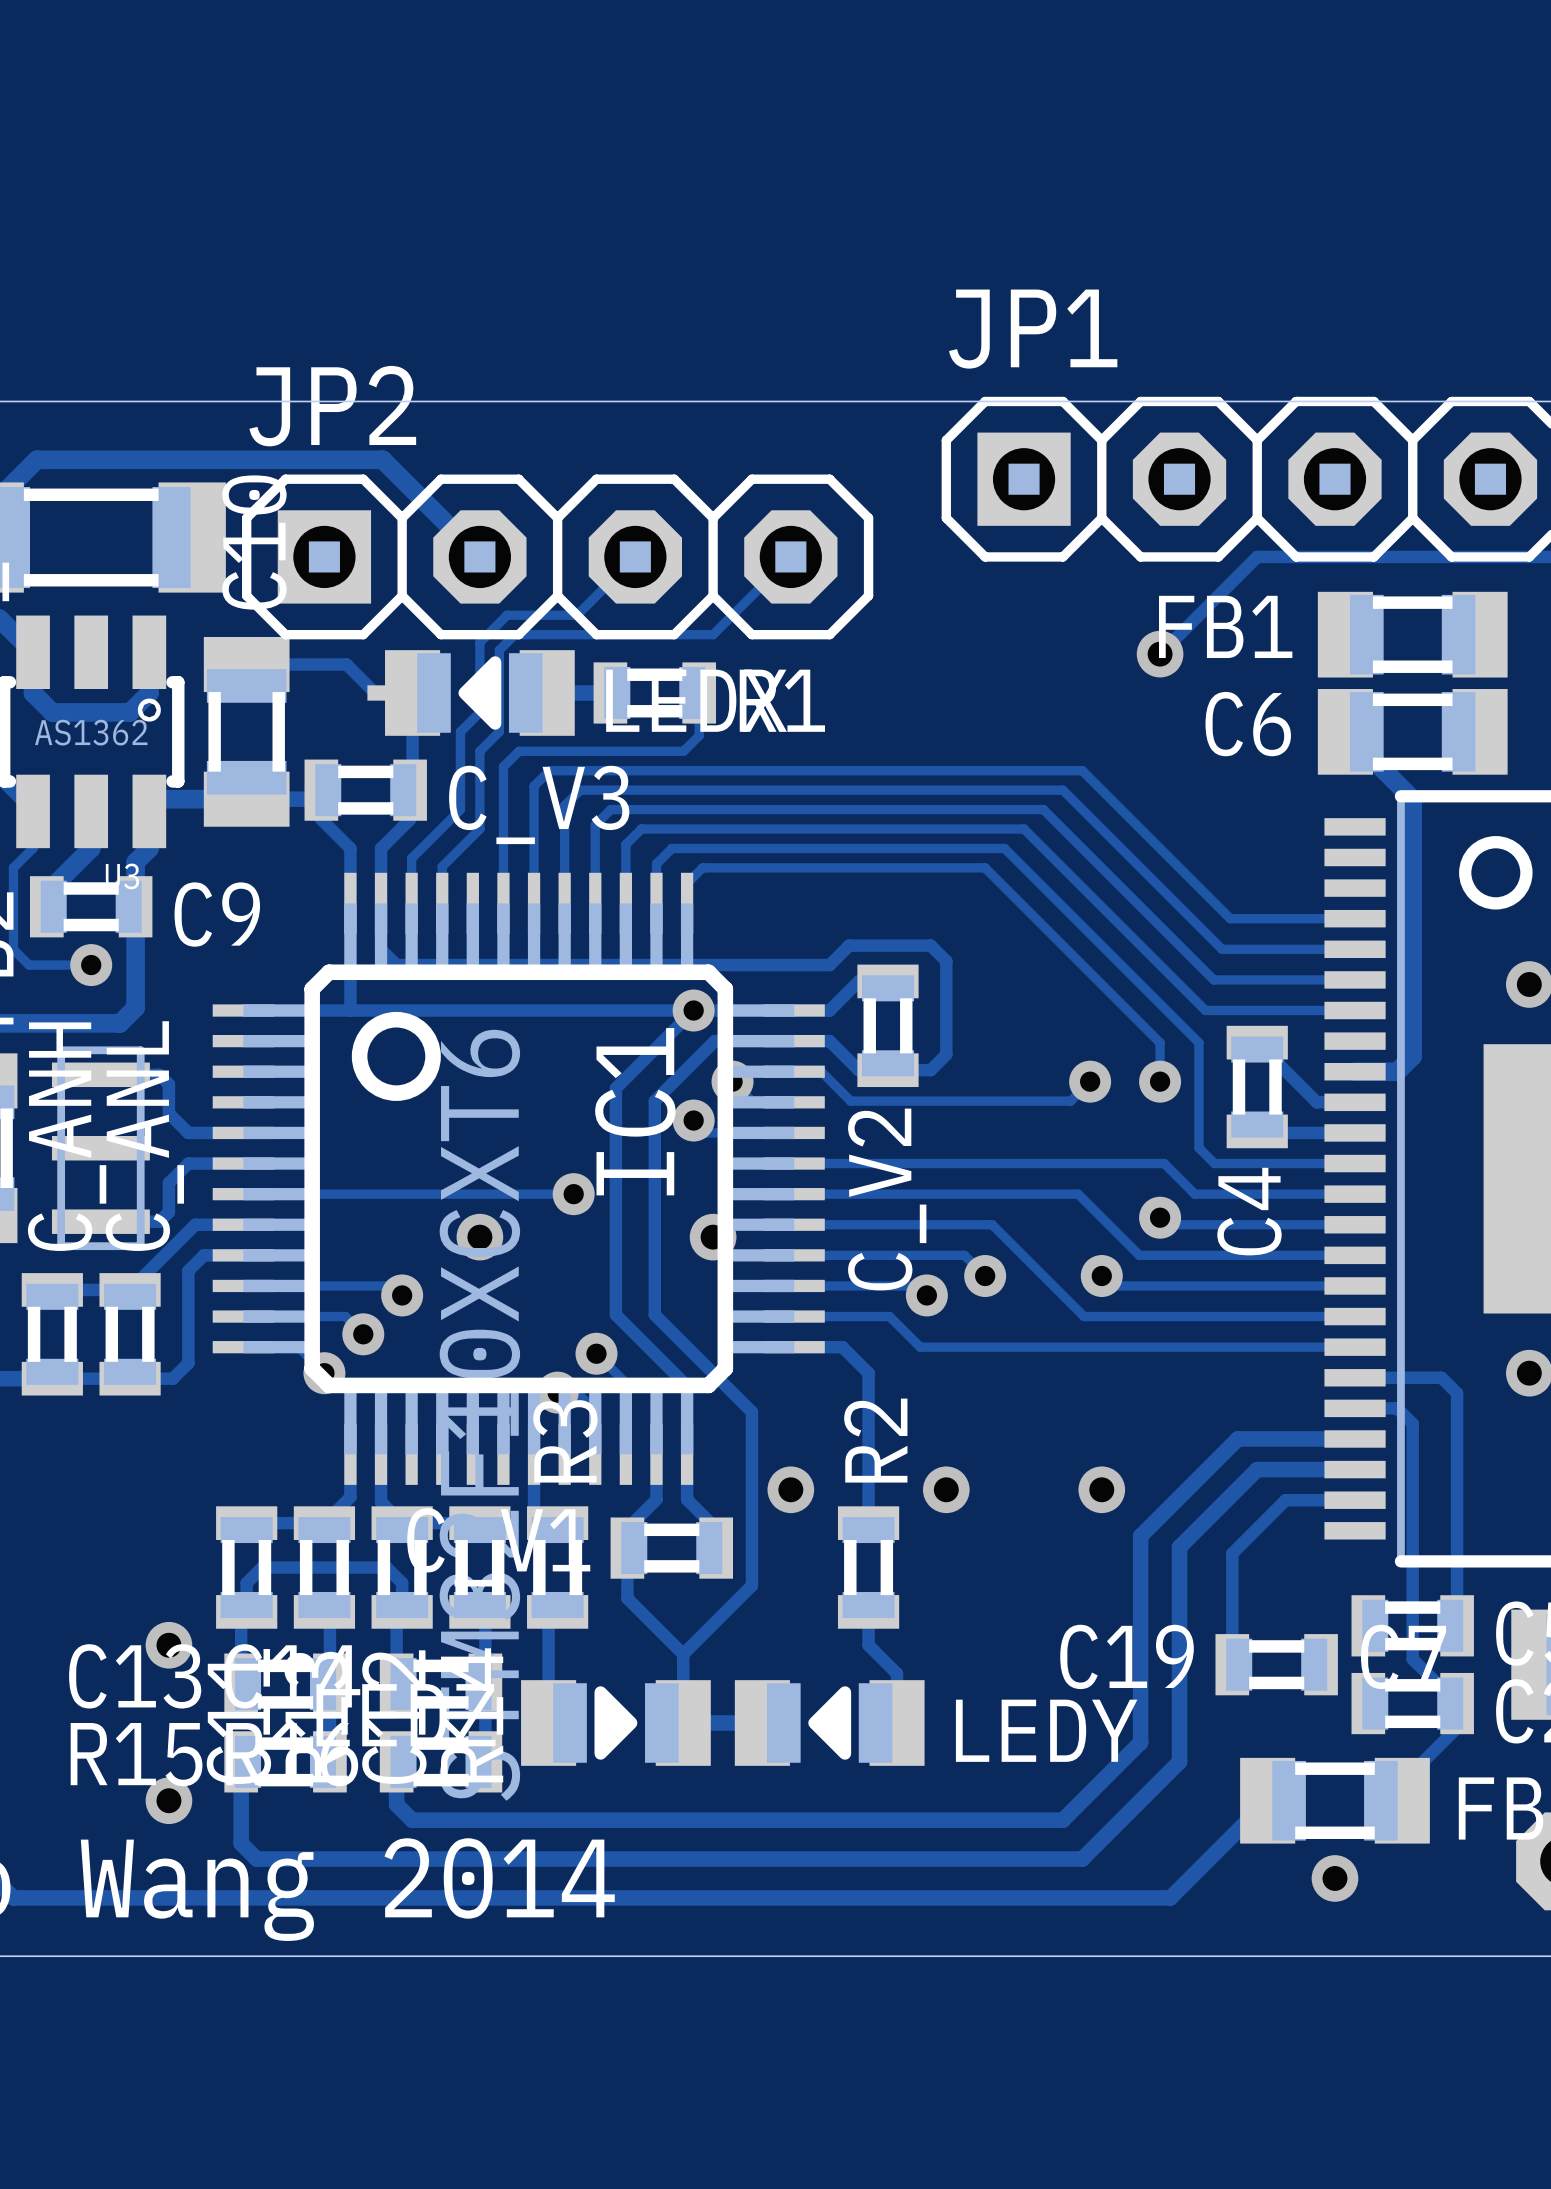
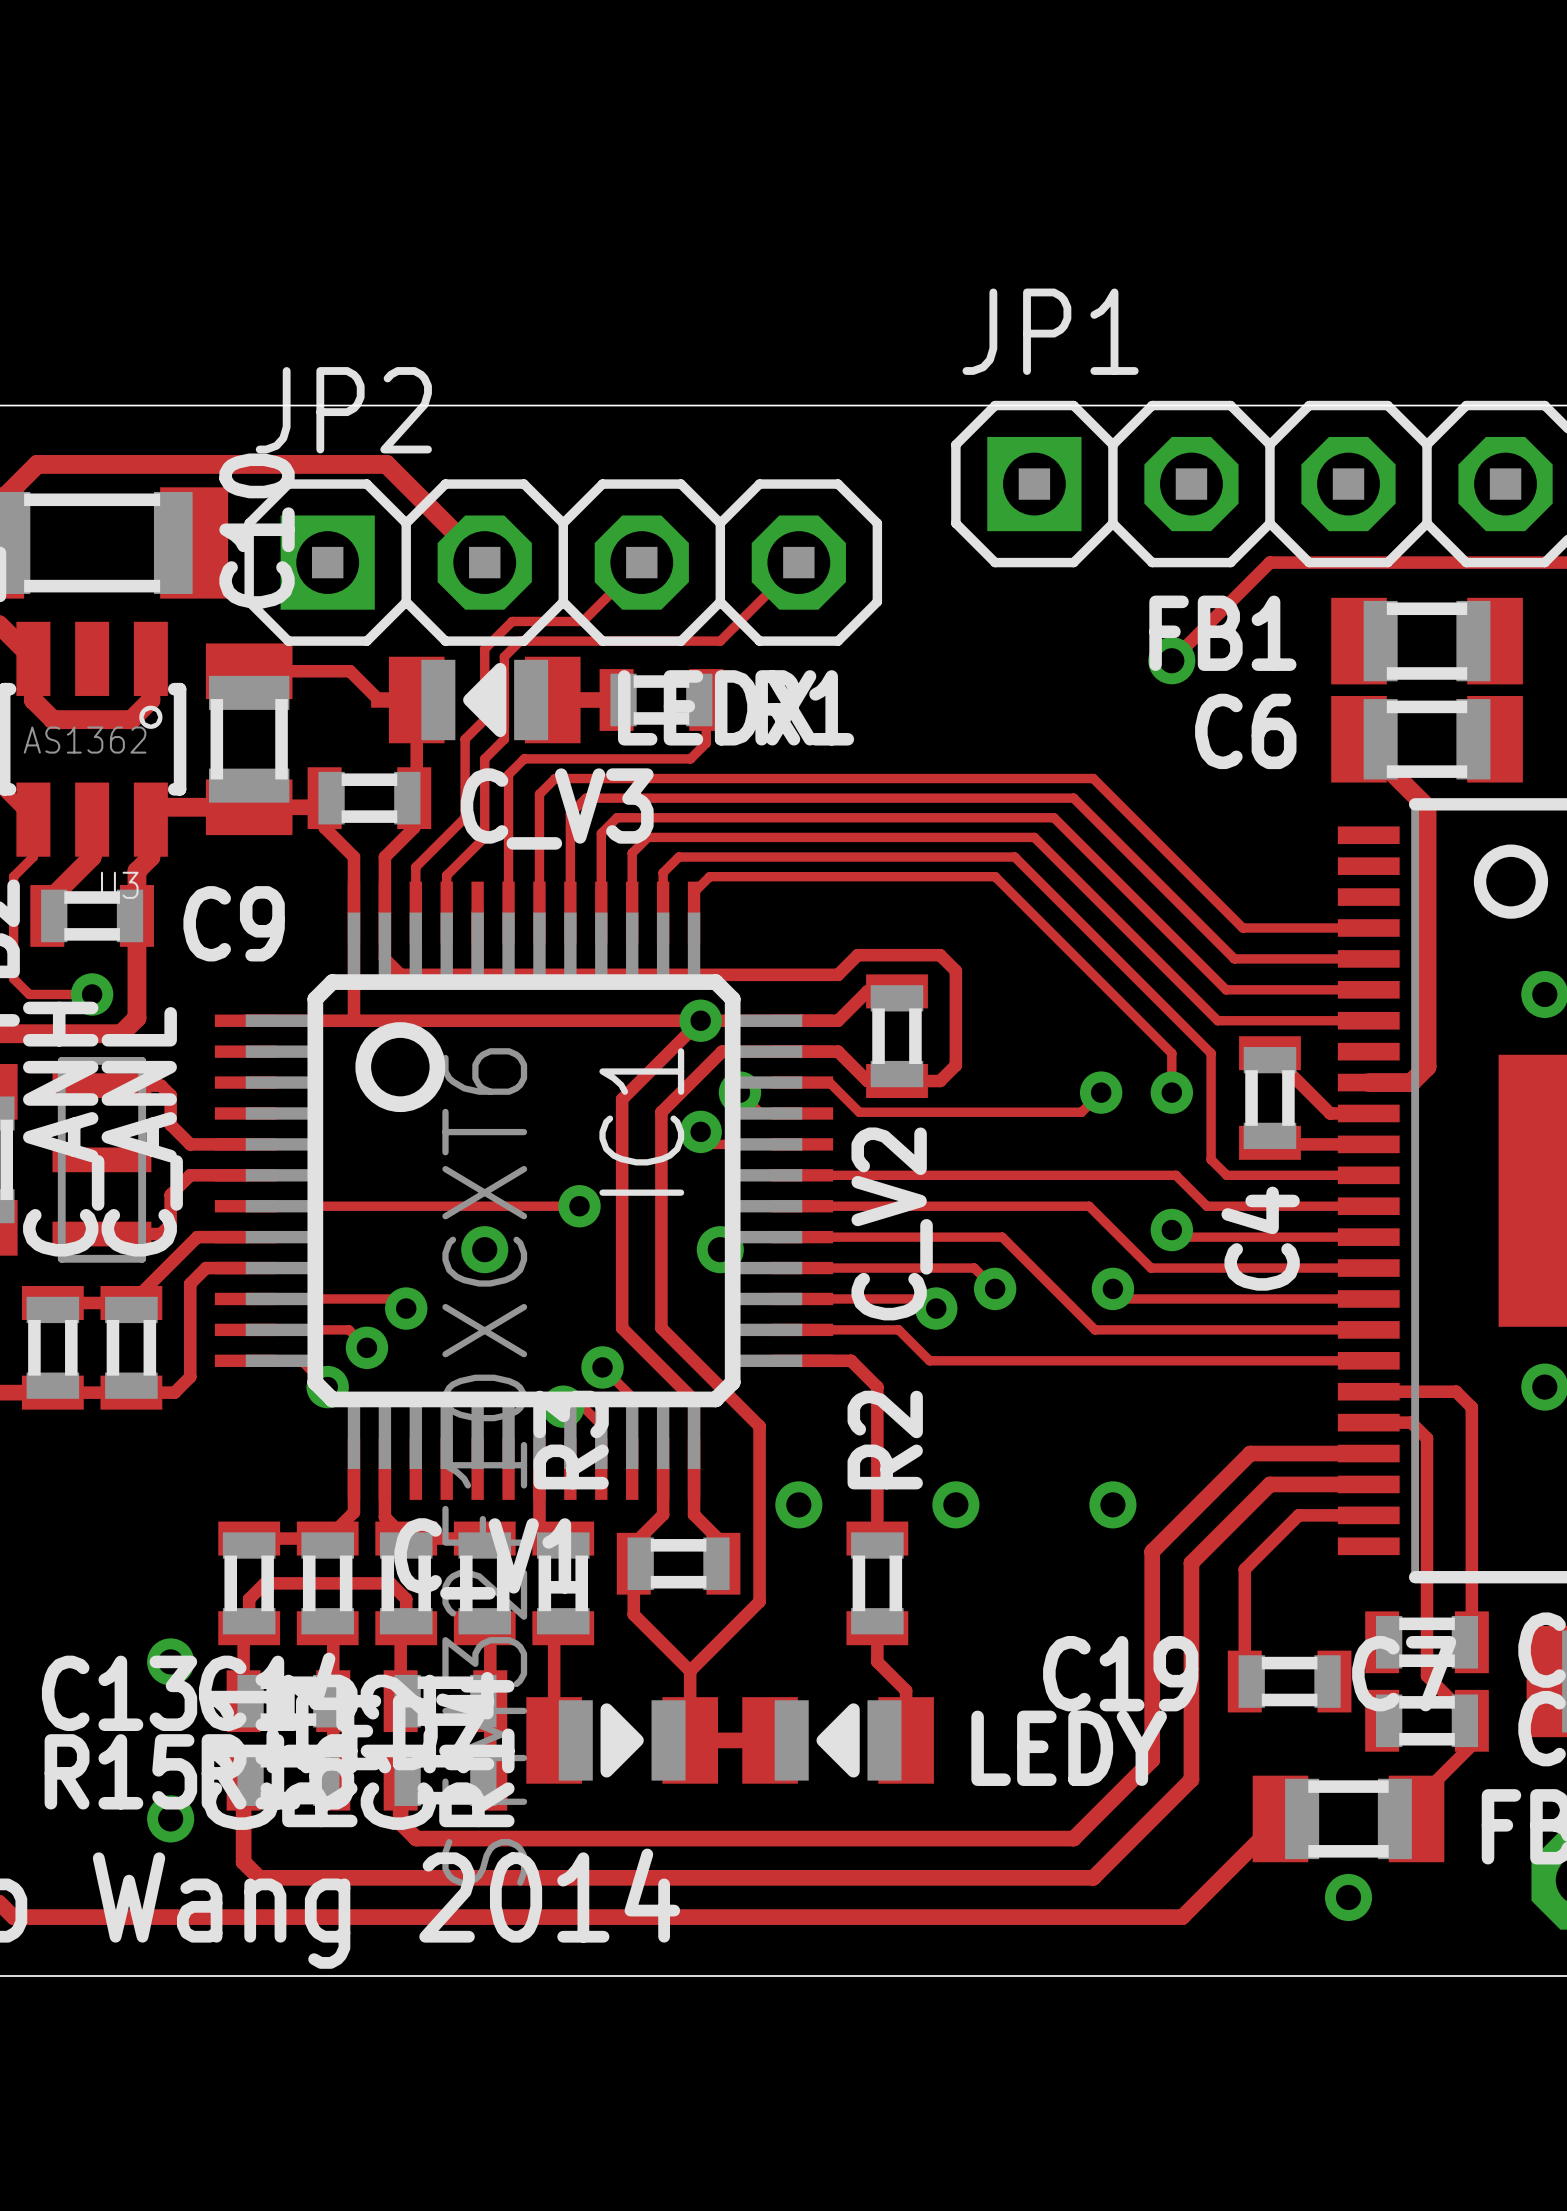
track: (13, 949) (29, 965) (91, 965) -> (13, 959) (13, 978) (29, 994) (92, 994)
via position: (91, 965) -> (92, 994)

